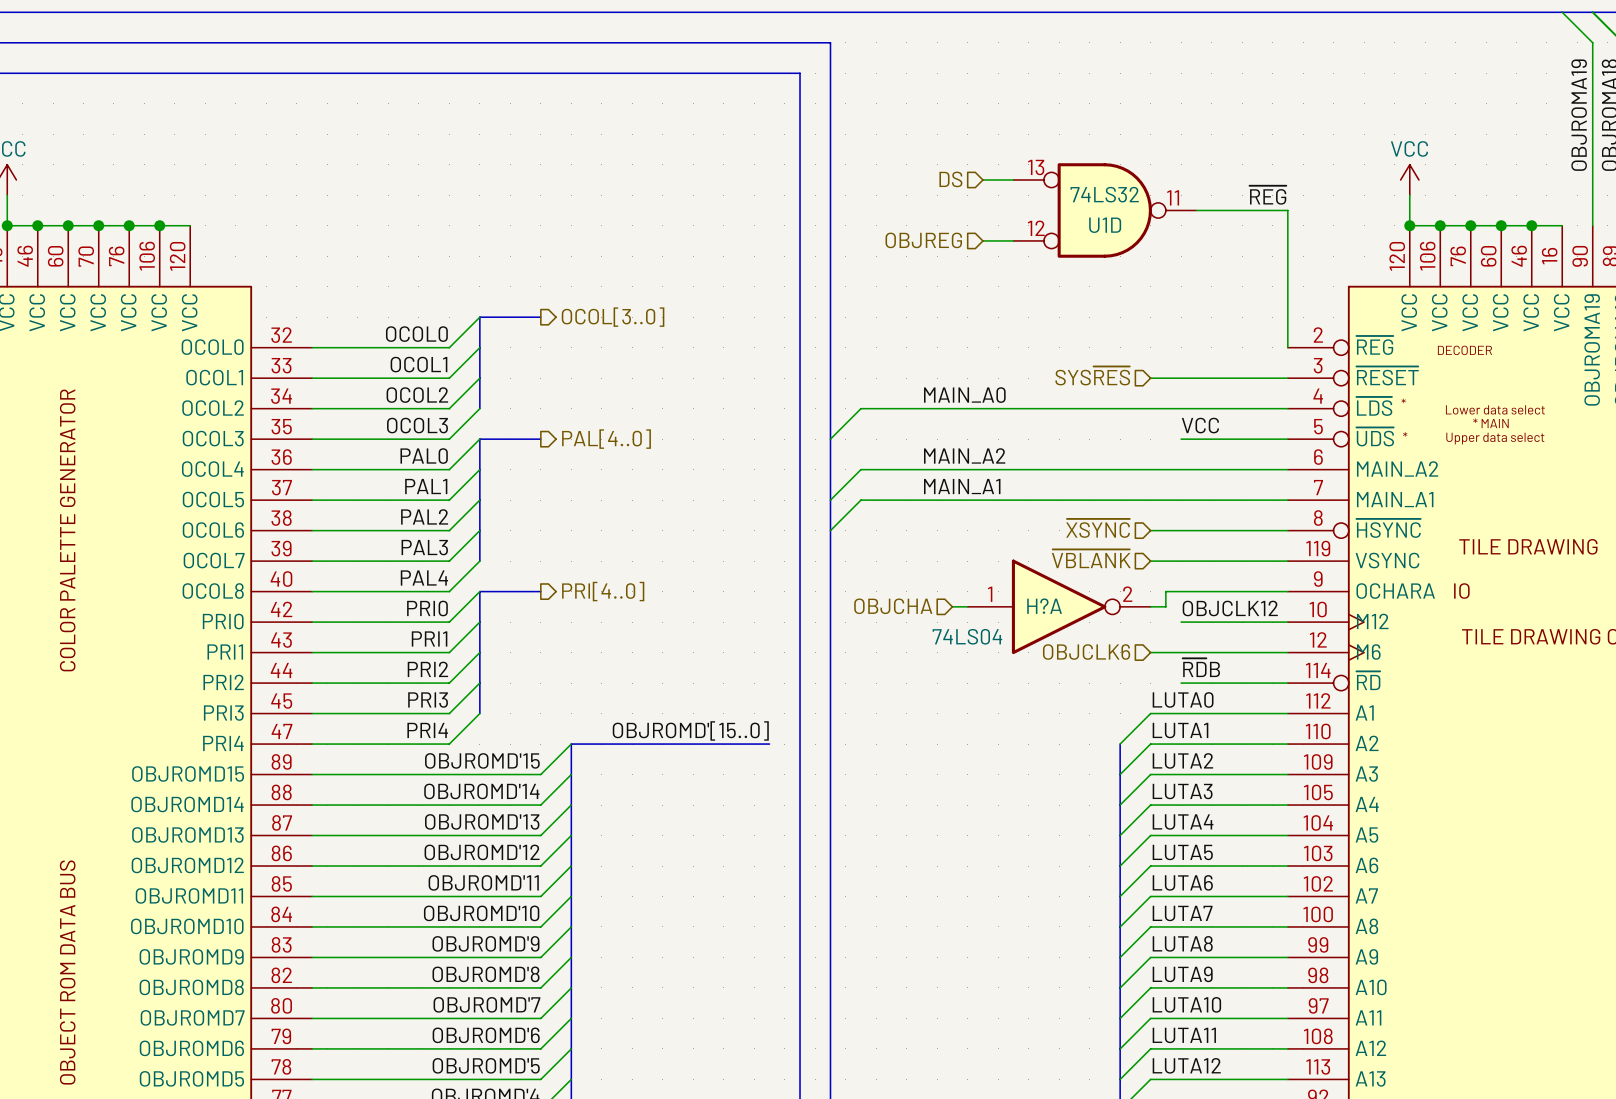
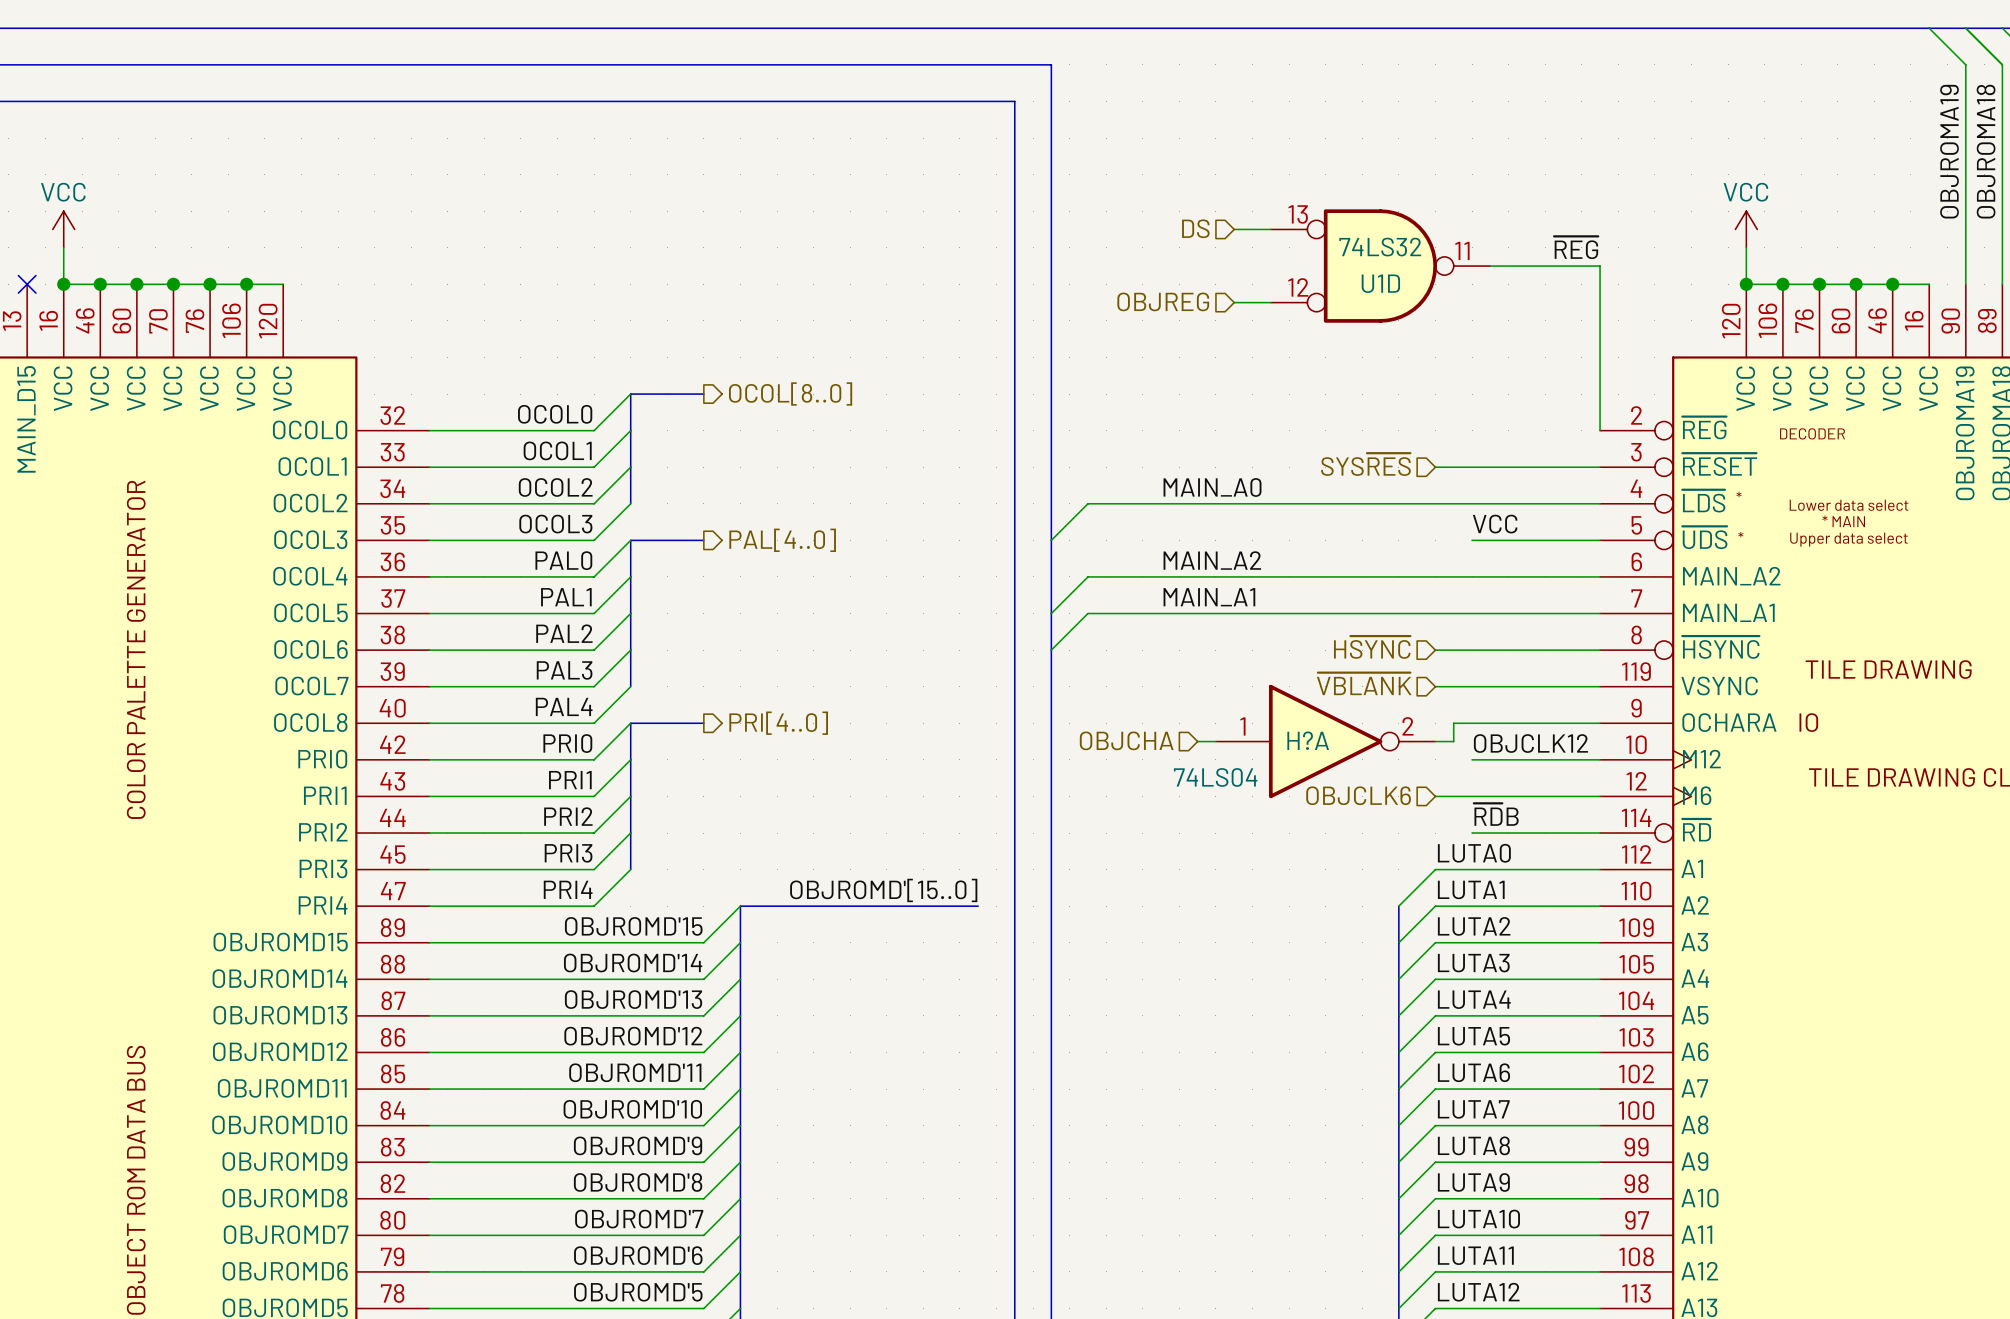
hierarchical label: OCOL[3..0] (613, 317) -> OCOL[8..0] (790, 393)
hierarchical label: ~{XSYNC} (1098, 528) -> H~{SYNC} (1372, 647)

